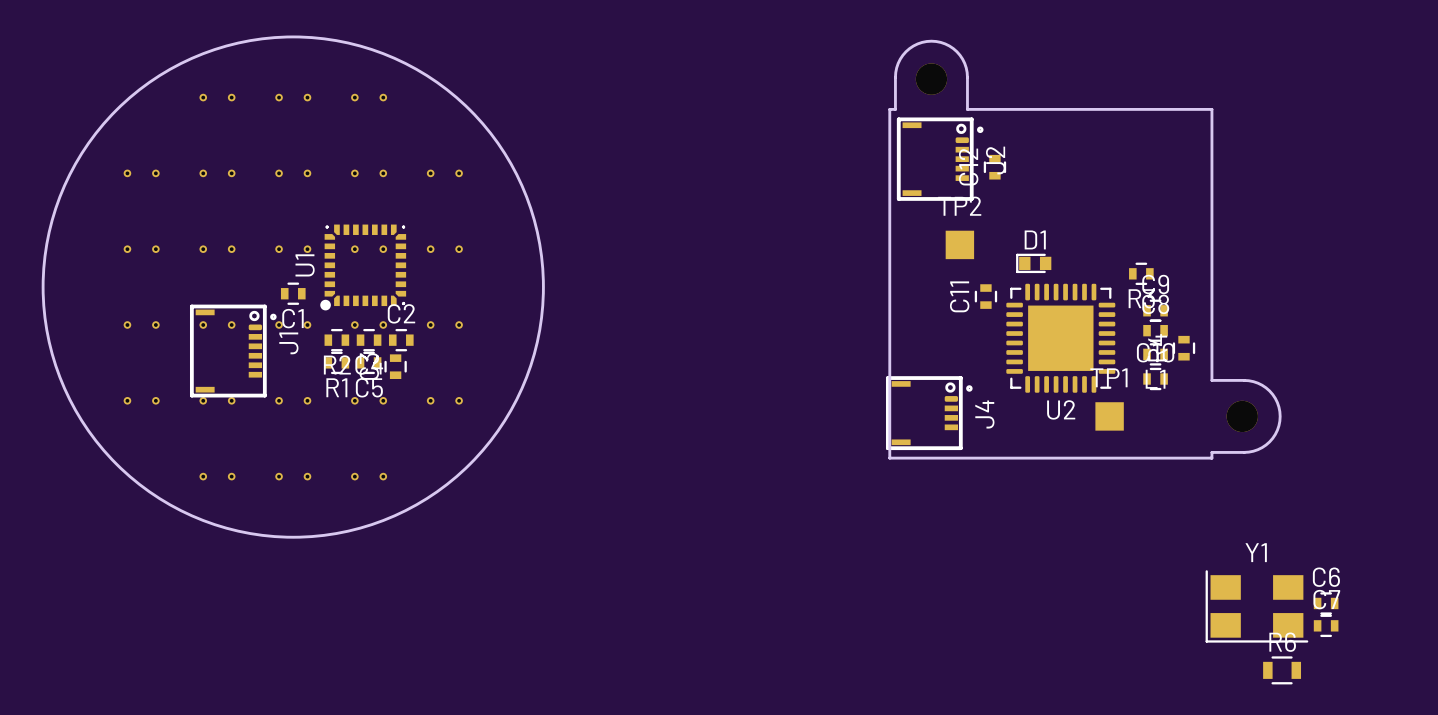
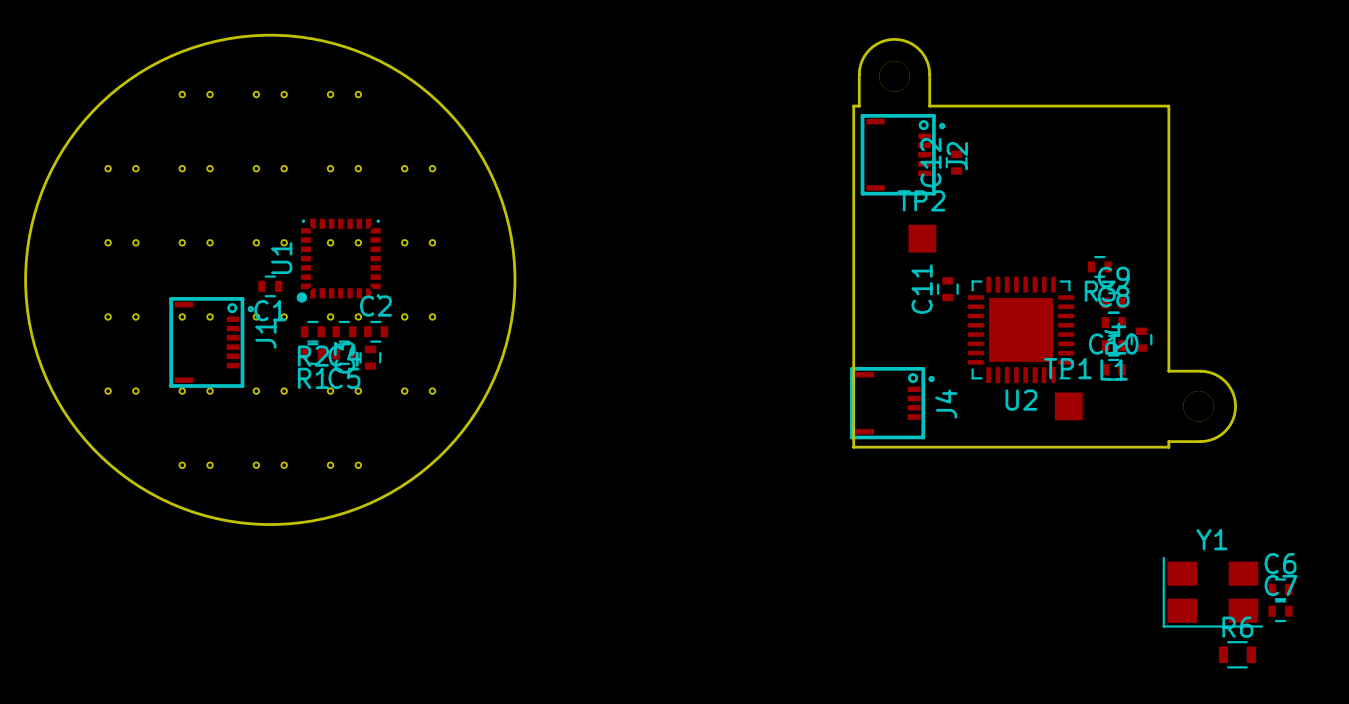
D1: (1033, 263) -> none

